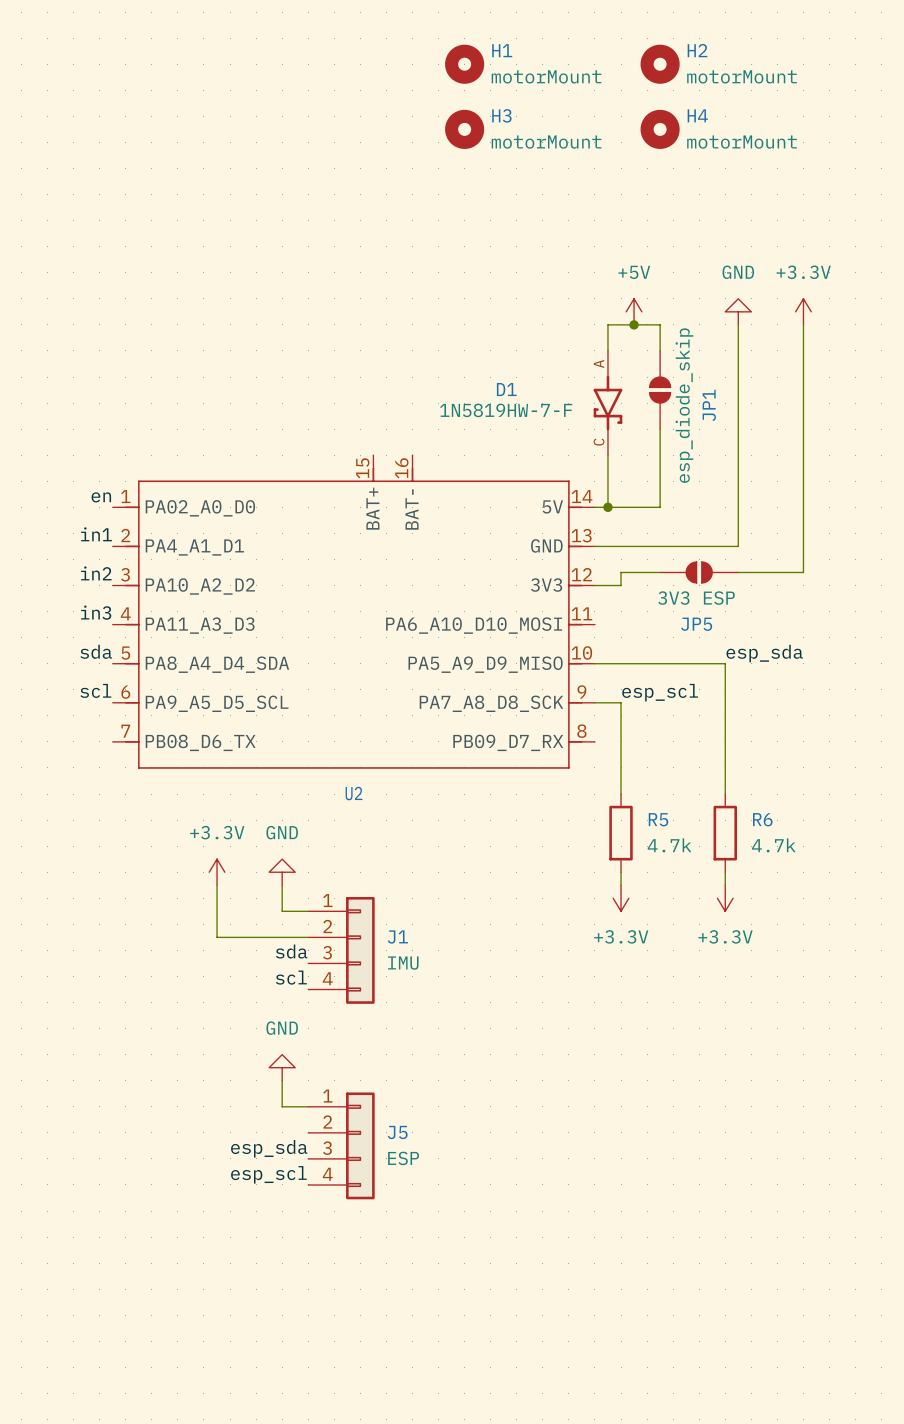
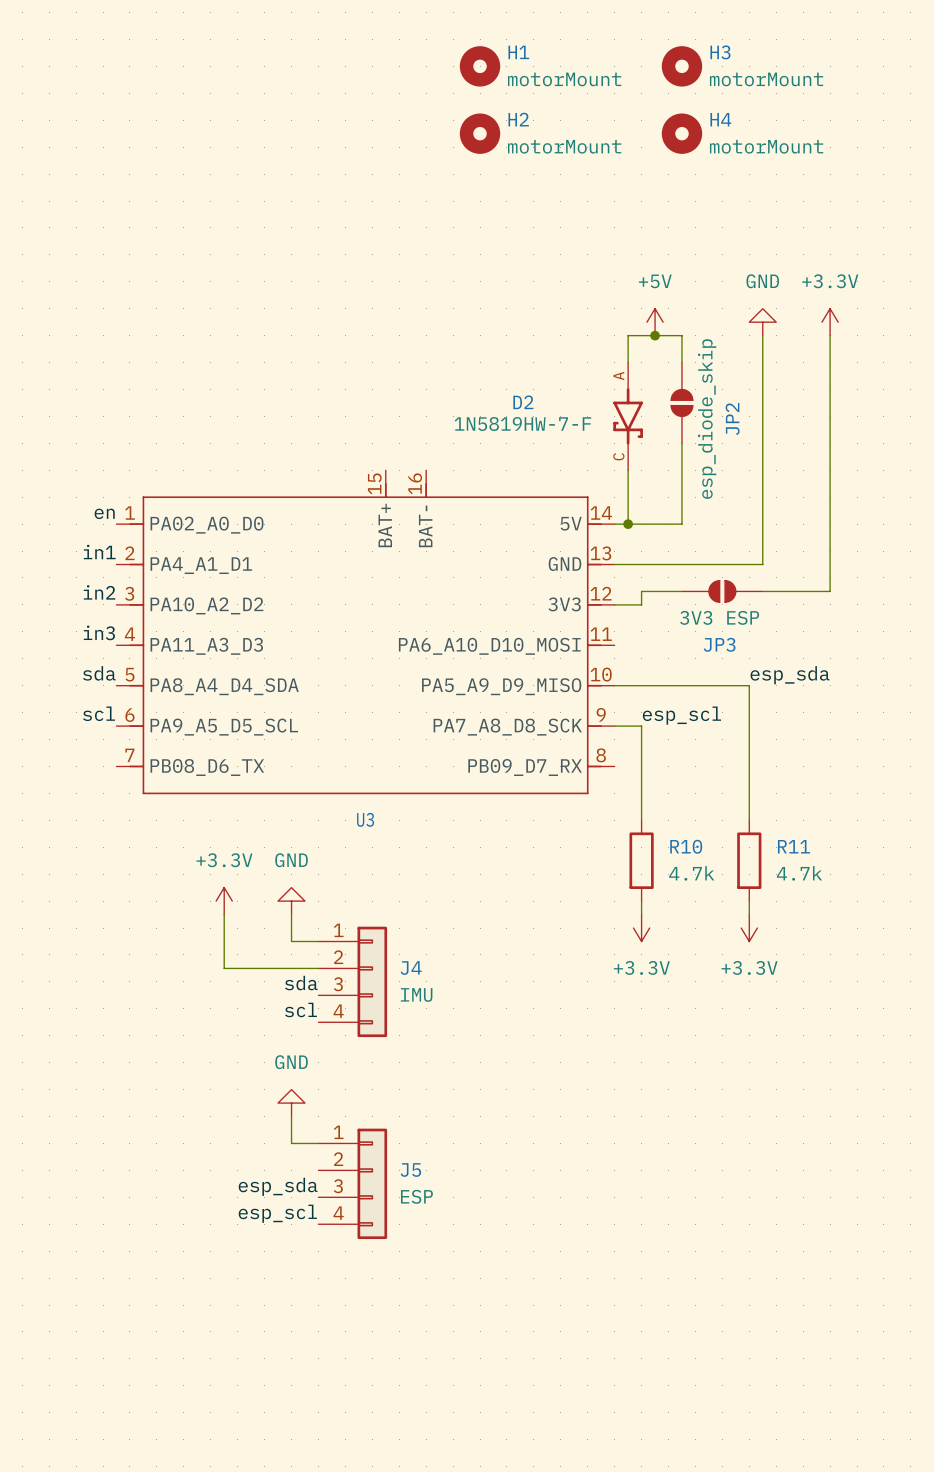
H2 name: H2 (697, 50) -> H3 (720, 52)
H3 name: H3 (501, 115) -> H2 (518, 119)
D1 name: D1 (506, 389) -> D2 (523, 402)
JP1 name: JP1 (709, 405) -> JP2 (732, 419)
JP5 name: JP5 (696, 624) -> JP3 (719, 644)
U2 name: U2 (353, 793) -> U3 (365, 819)
R5 name: R5 (658, 819) -> R10 (686, 846)
R6 name: R6 (762, 819) -> R11 (794, 846)
J1 name: J1 (397, 937) -> J4 (411, 968)

